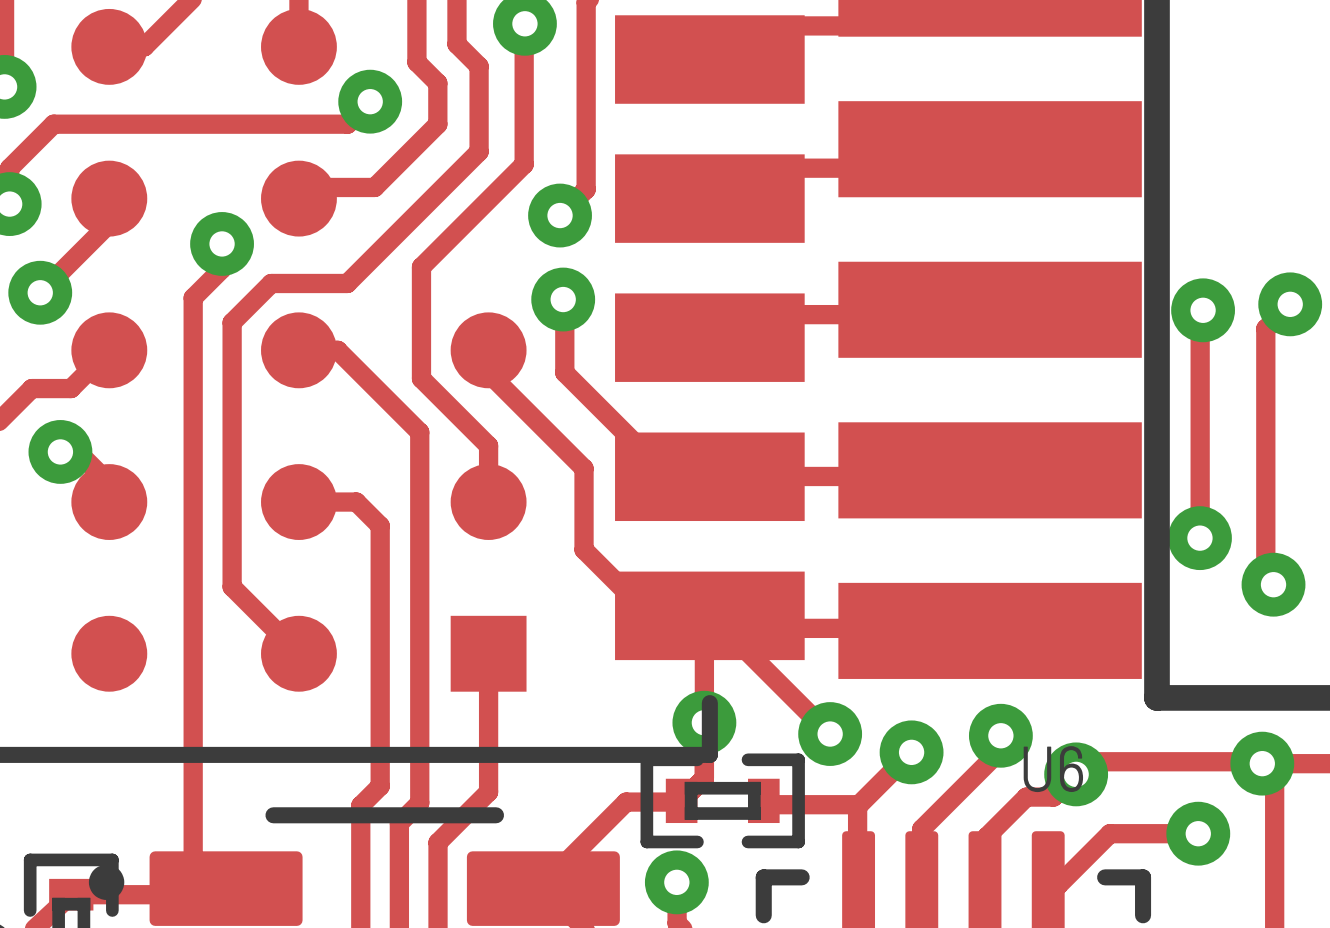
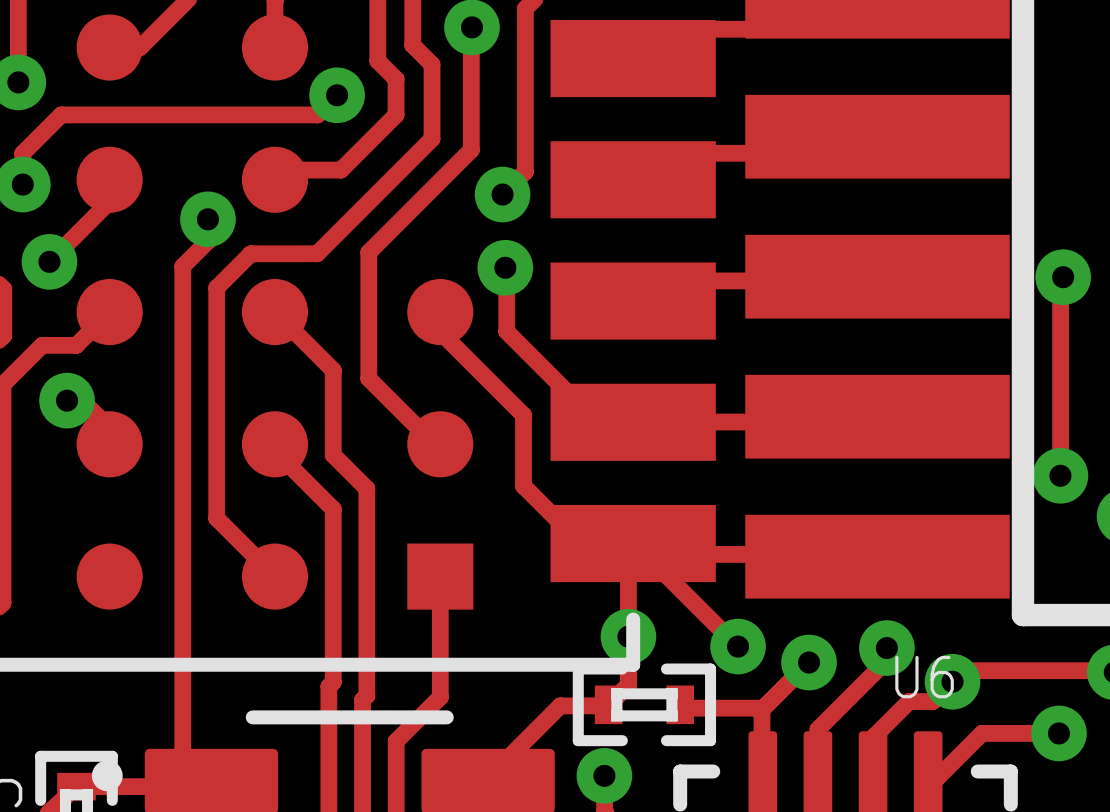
track: (421, 267) (421, 378) (488, 445) (488, 502) -> (381, 239) (368, 252) (368, 378) (434, 444) (440, 444)
track: (298, 350) (337, 350) (419, 432) (419, 802) (399, 823) -> (274, 312) (333, 370) (333, 455) (366, 488) (366, 695) (362, 700) (362, 724)
track: (298, 502) (356, 502) (380, 525) (380, 786) (360, 805) -> (274, 444) (274, 450) (333, 509) (333, 682) (328, 686) (328, 708)

